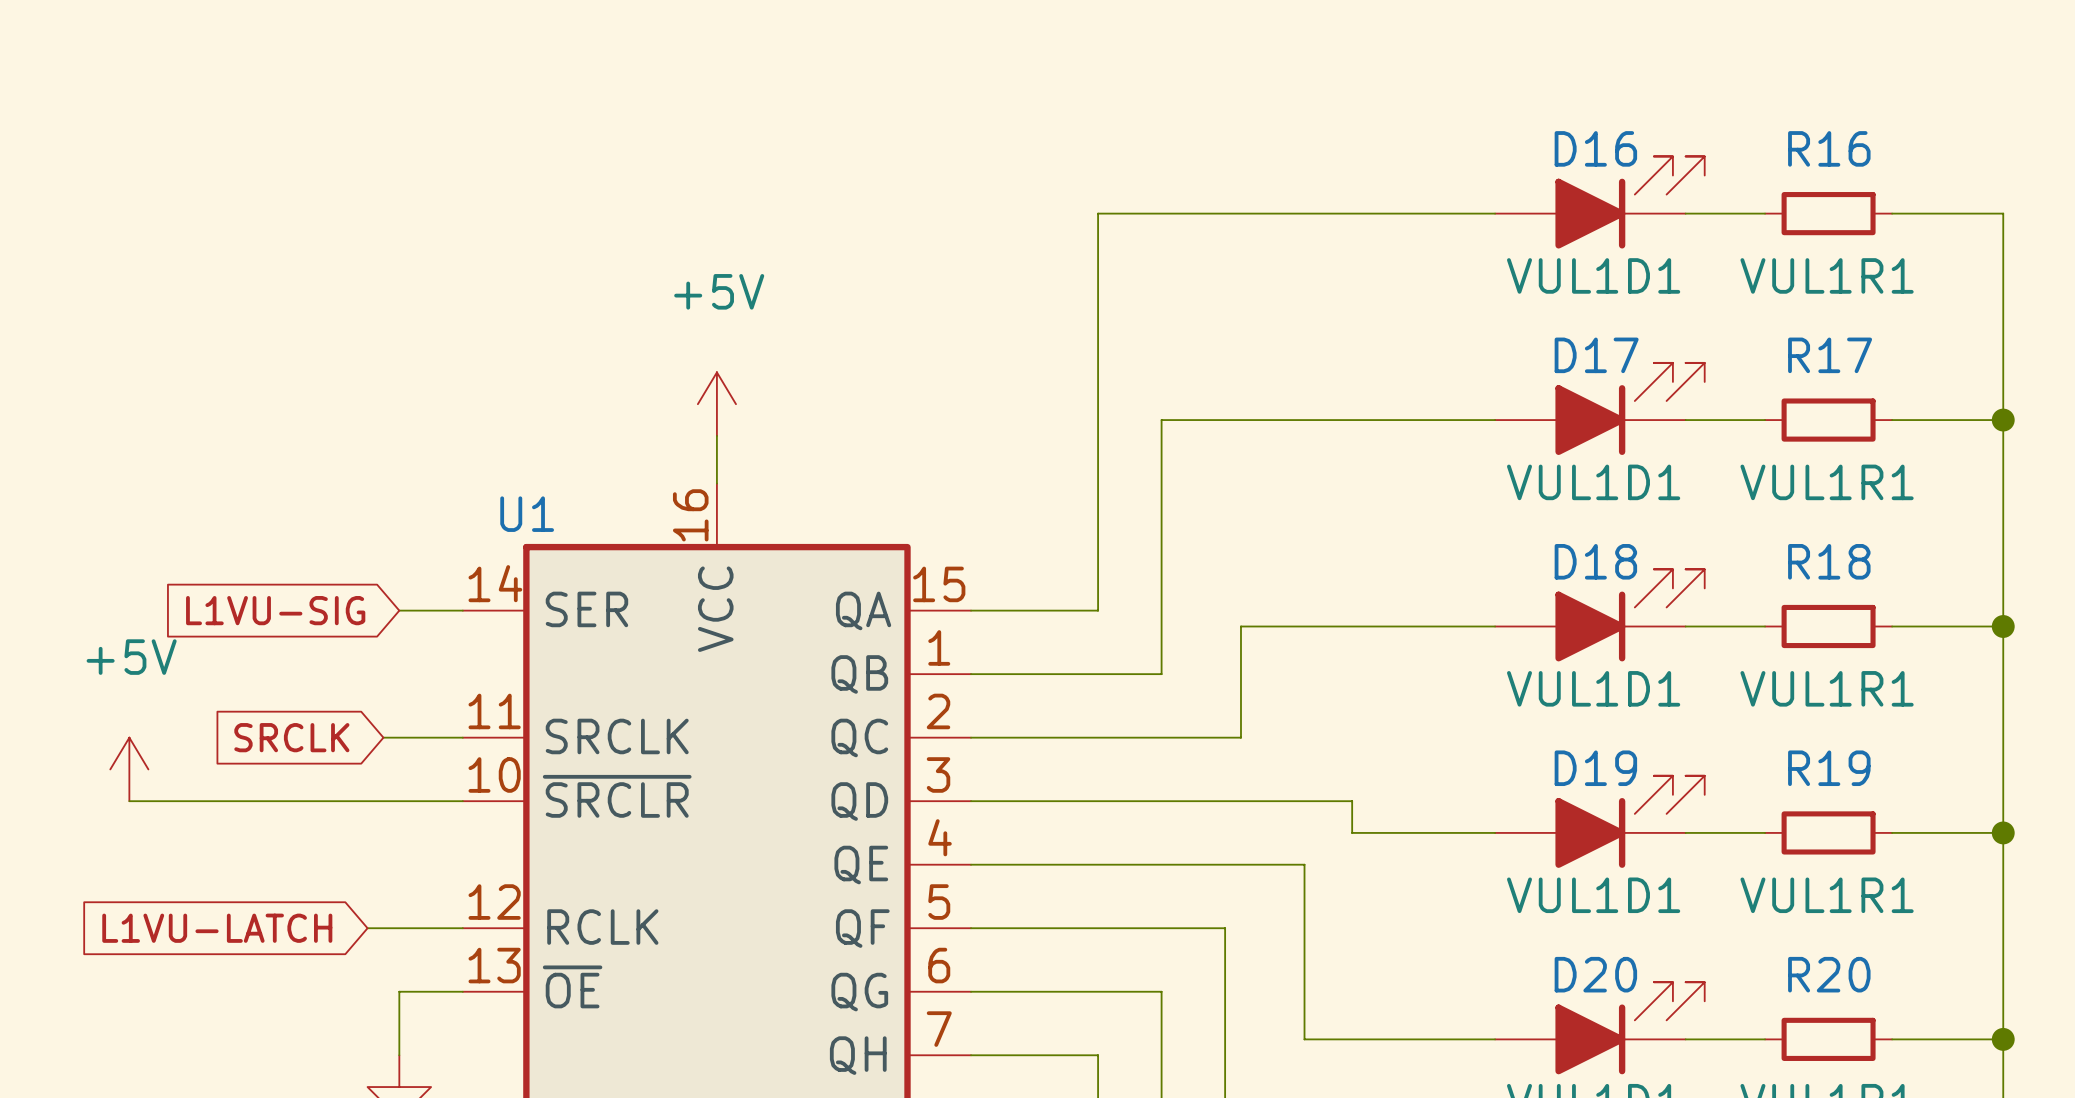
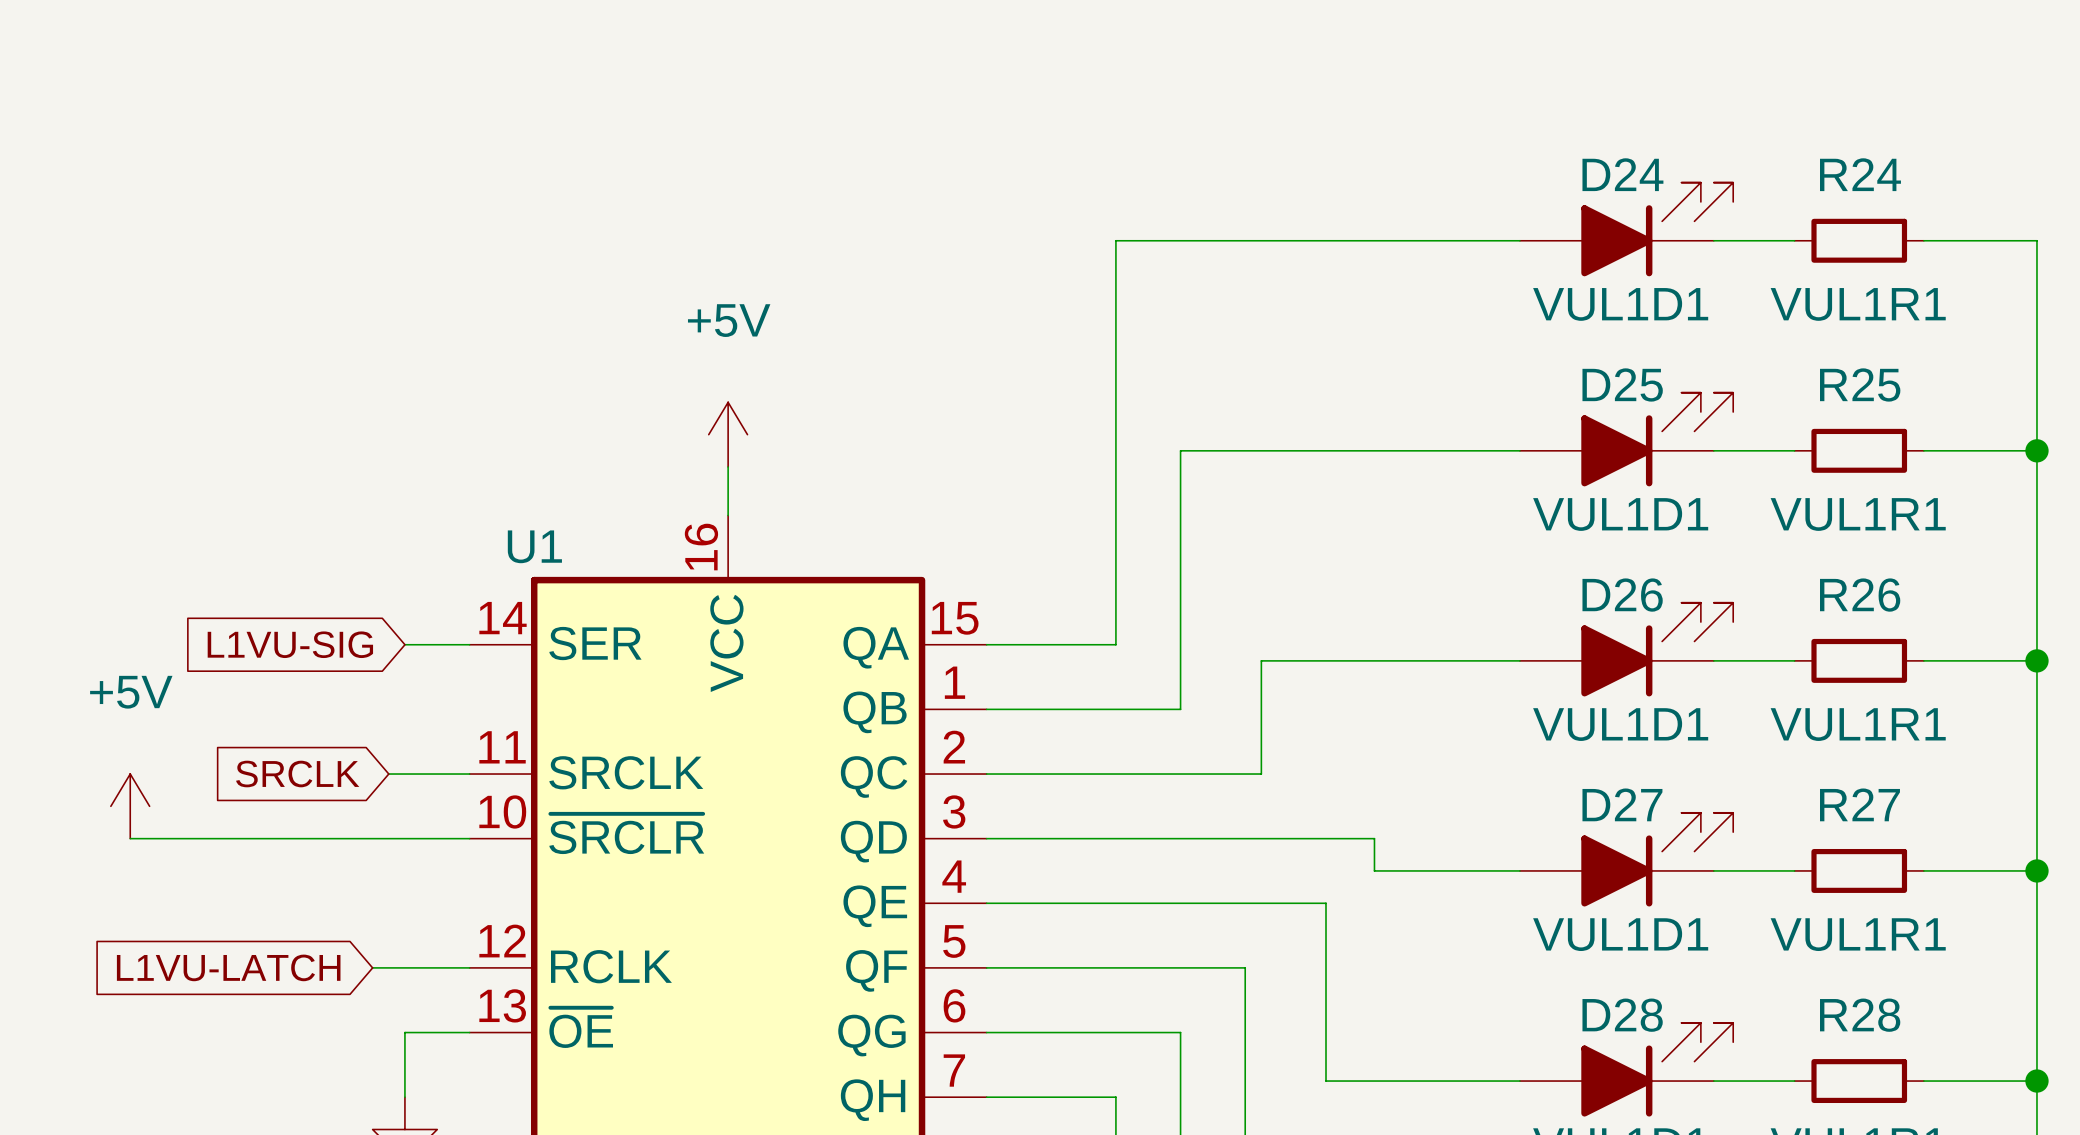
D16 name: D16 (1595, 148) -> D24 (1622, 174)
R16 name: R16 (1829, 148) -> R24 (1860, 174)
D17 name: D17 (1596, 355) -> D25 (1622, 384)
R17 name: R17 (1830, 355) -> R25 (1860, 384)
D18 name: D18 (1595, 561) -> D26 (1622, 595)
R18 name: R18 (1829, 561) -> R26 (1860, 595)
D19 name: D19 (1595, 768) -> D27 (1622, 804)
R19 name: R19 (1829, 768) -> R27 (1859, 804)
D20 name: D20 (1595, 974) -> D28 (1622, 1015)
R20 name: R20 (1829, 974) -> R28 (1860, 1015)

